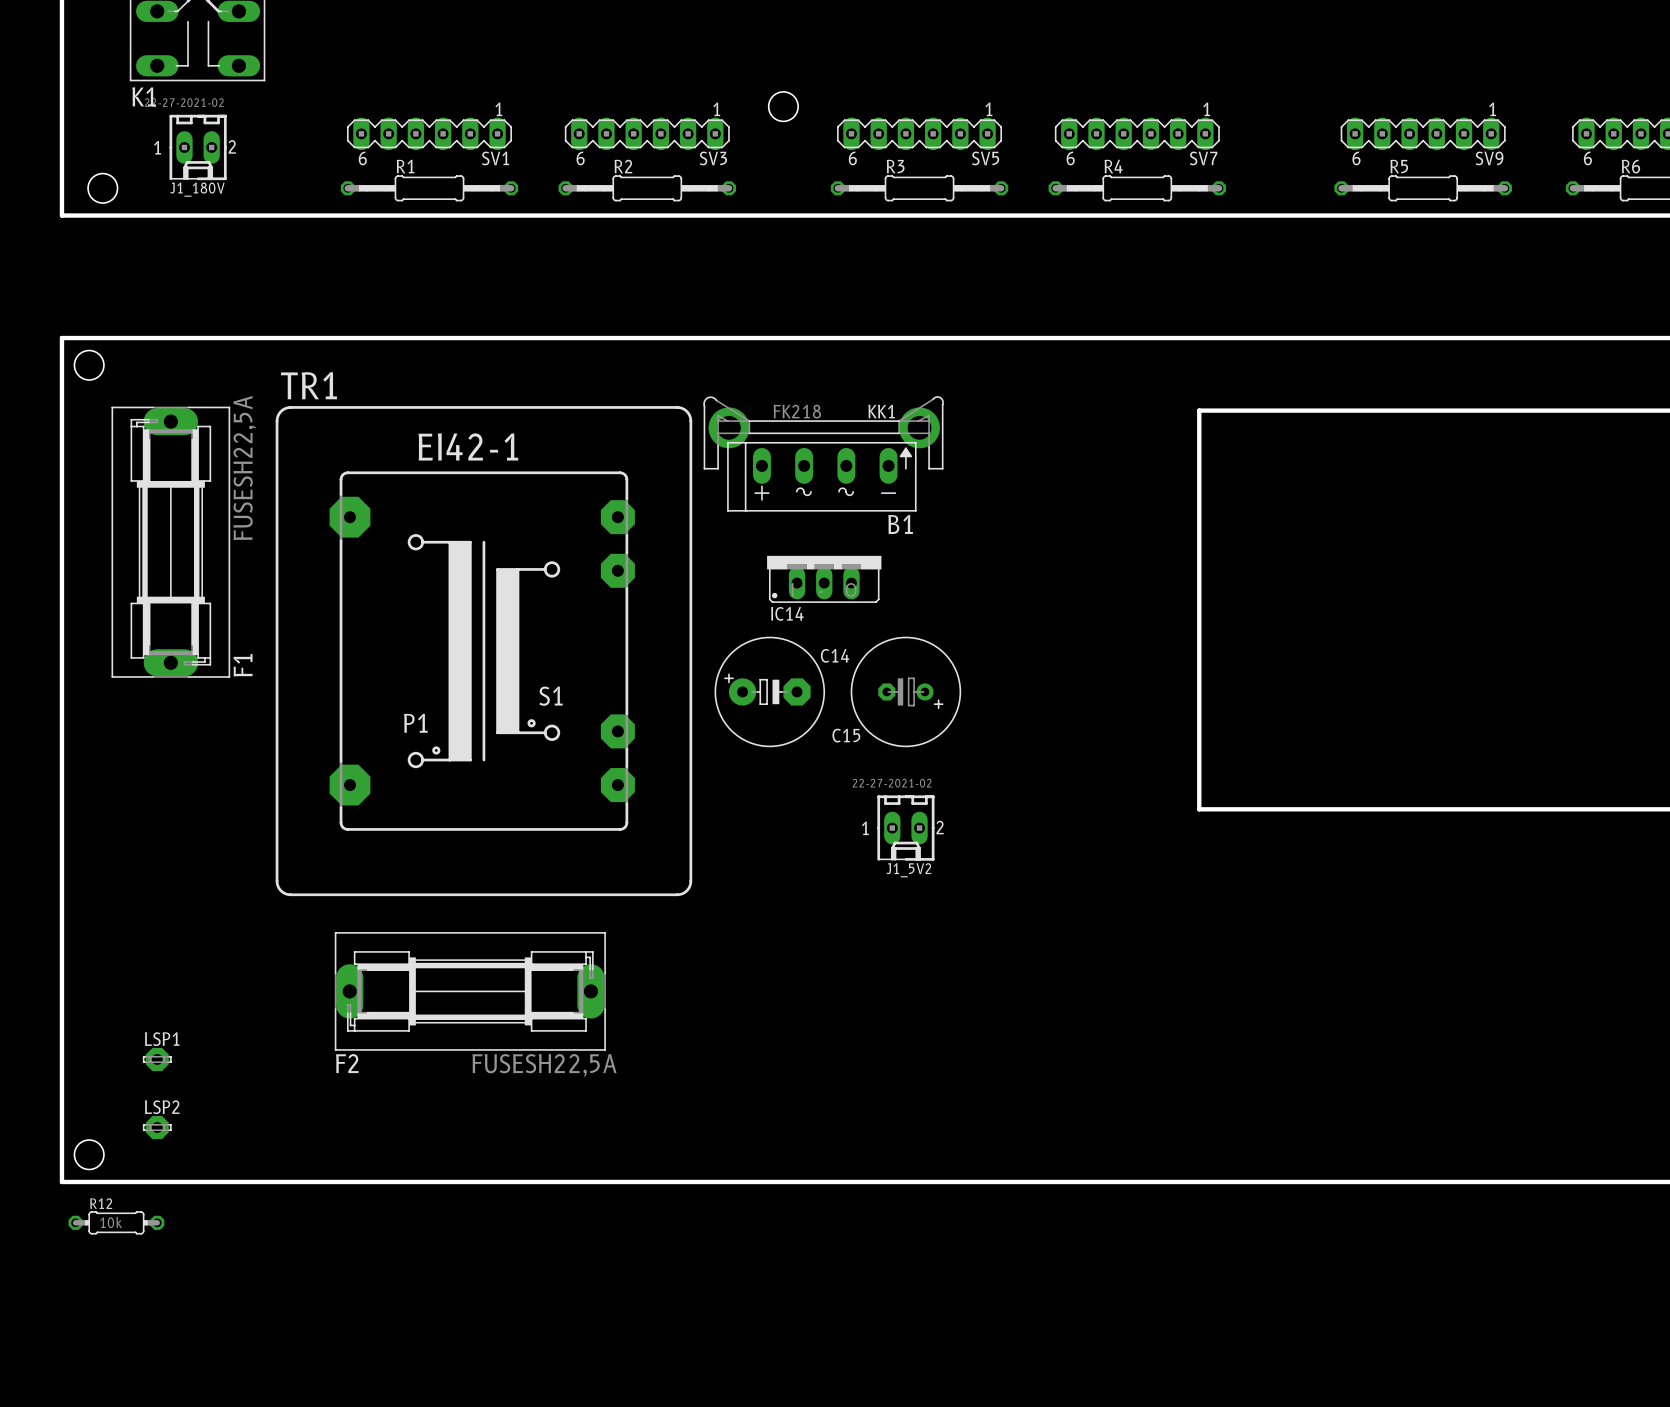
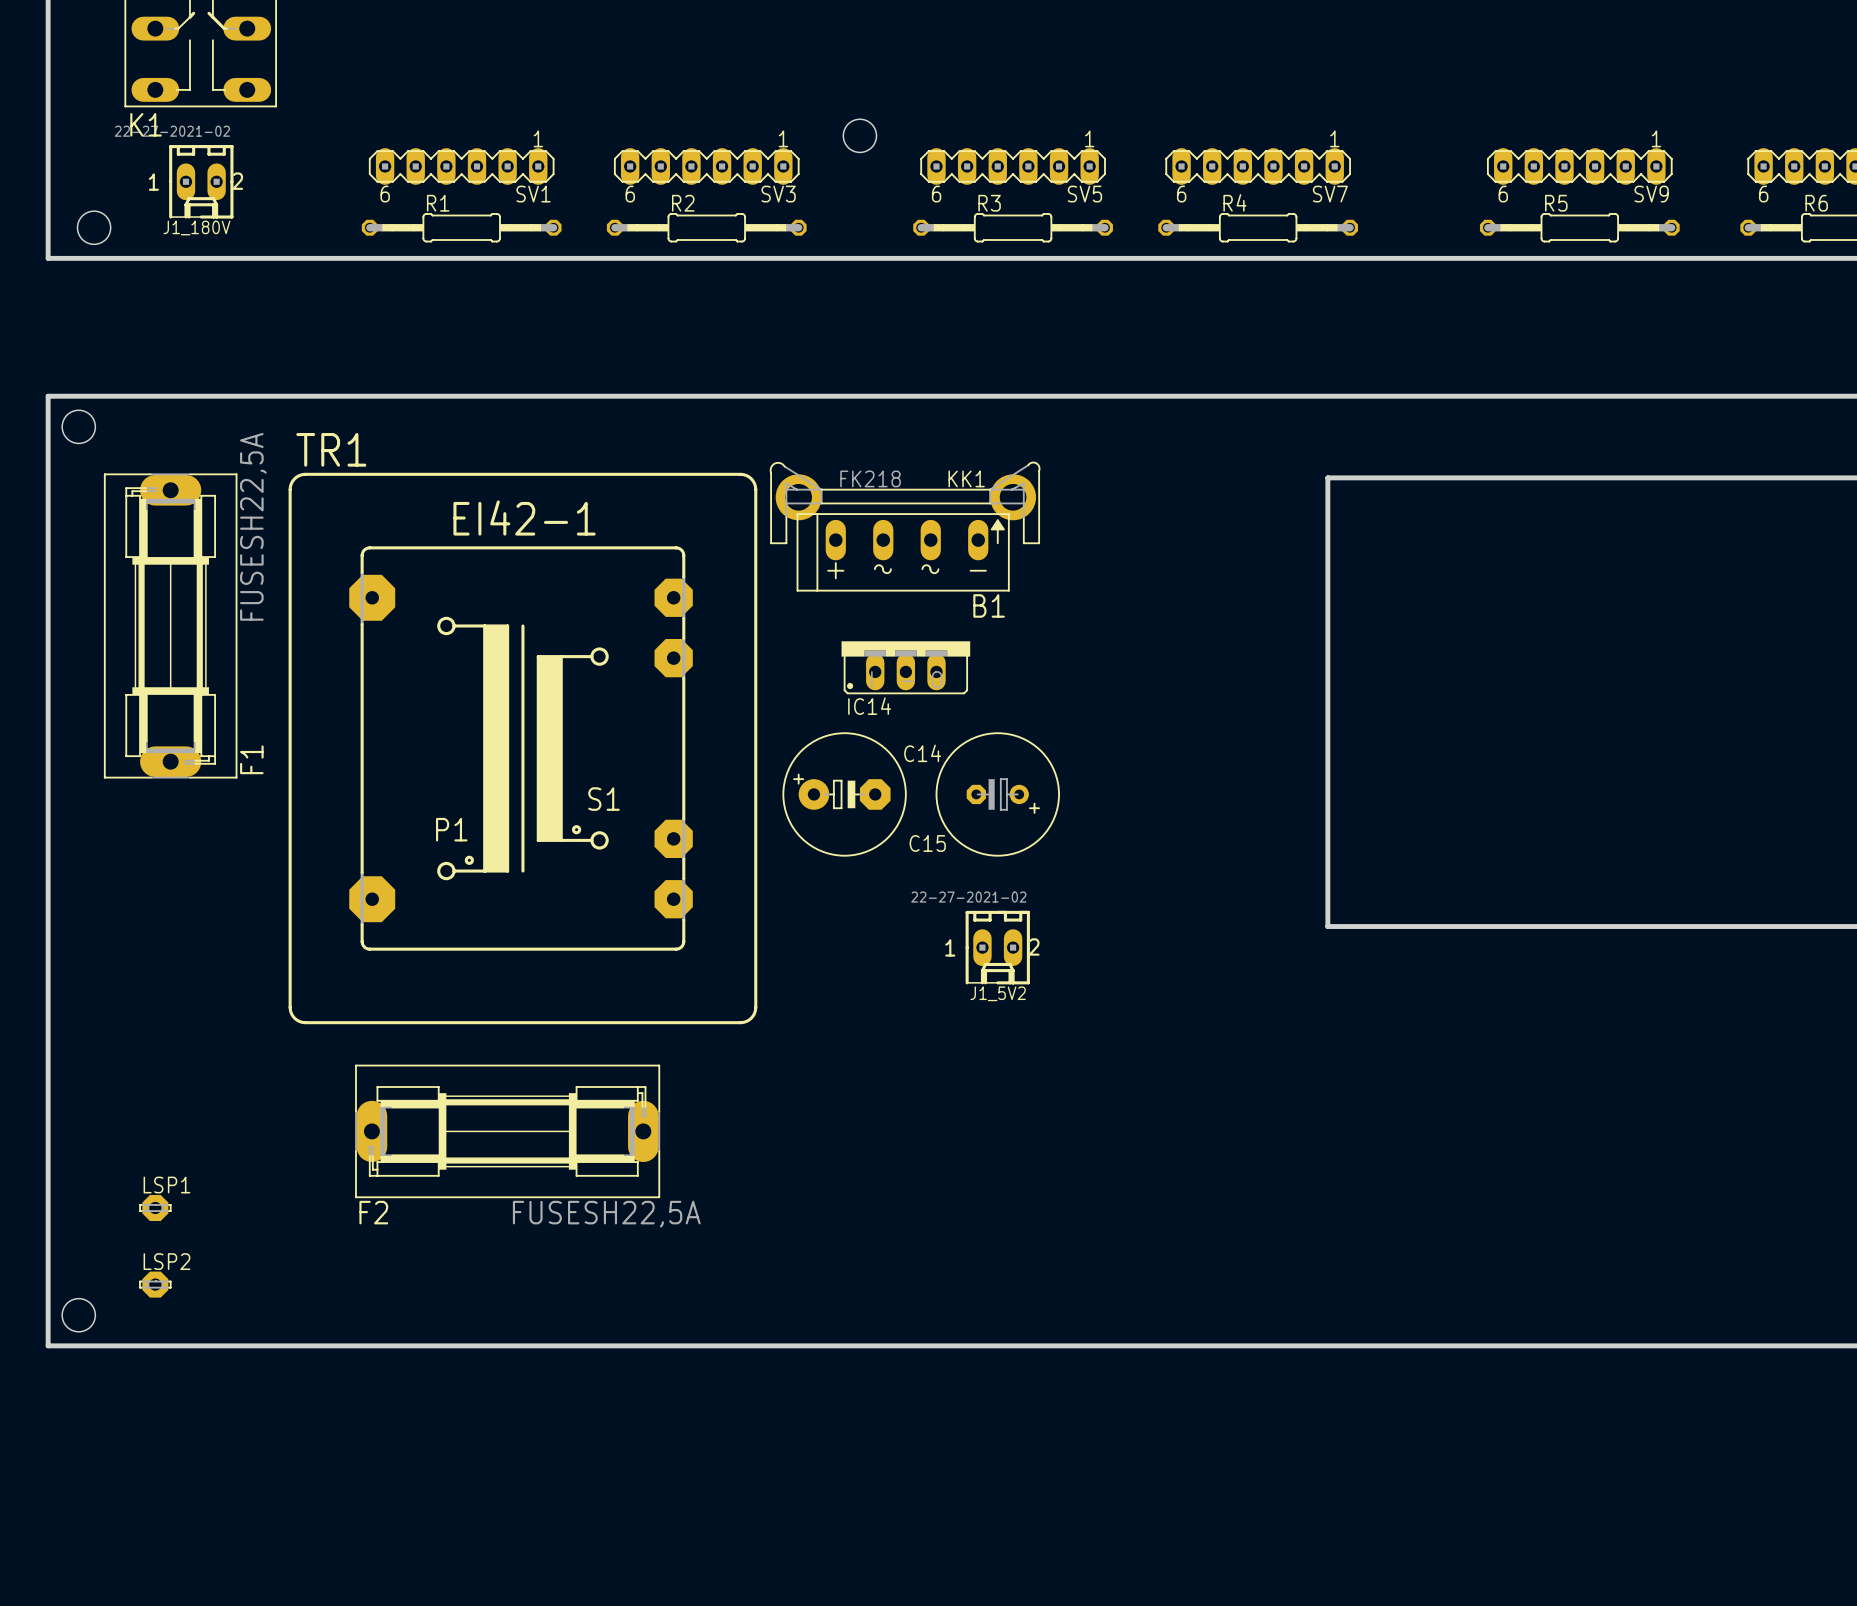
R12: 10k (116, 1222) -> none

